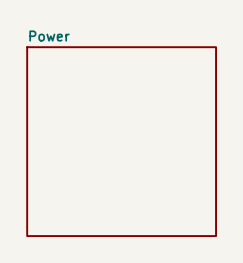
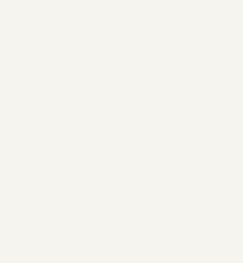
sheet Power: (121, 141) -> none

